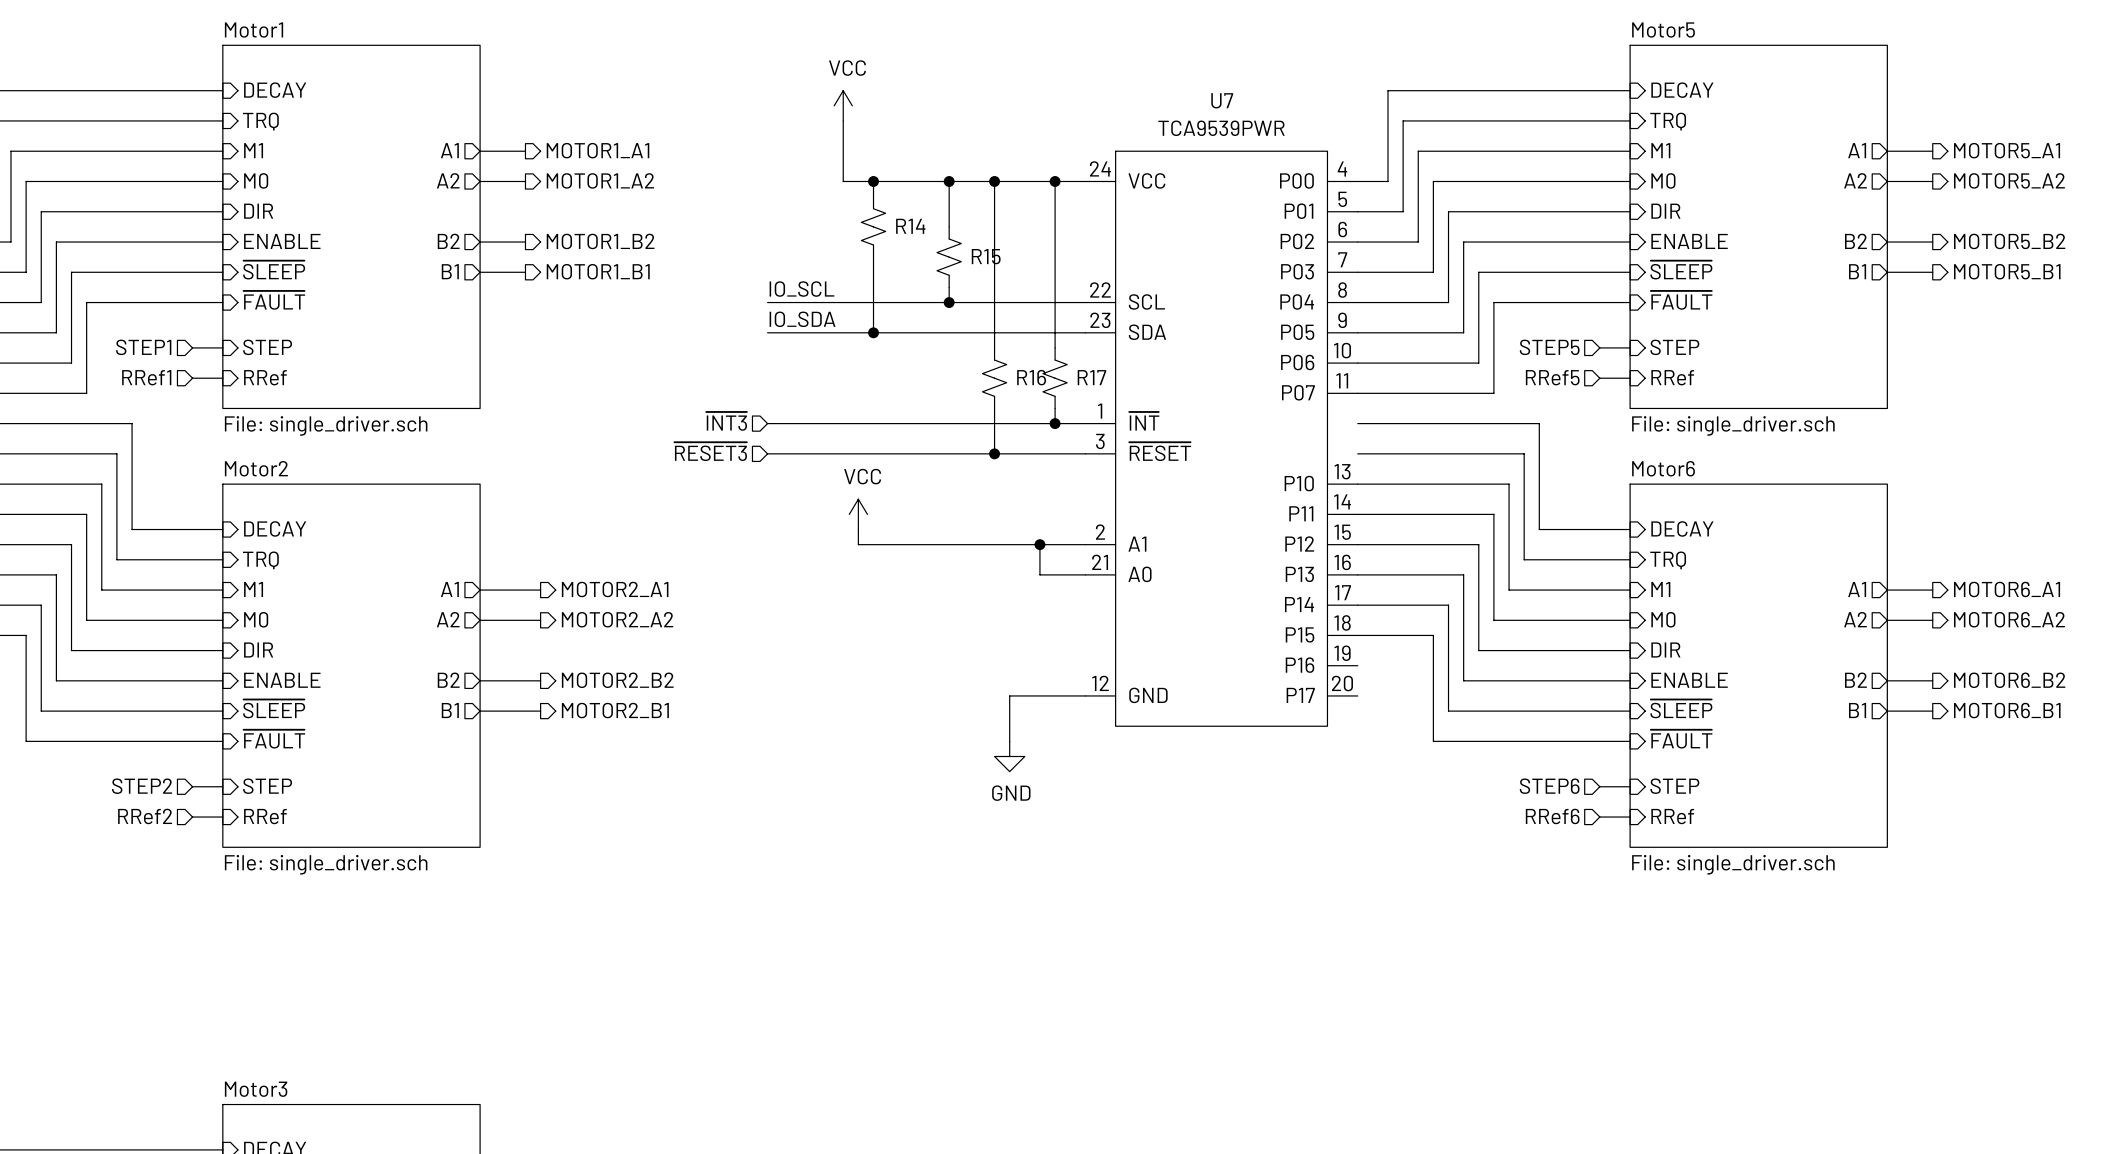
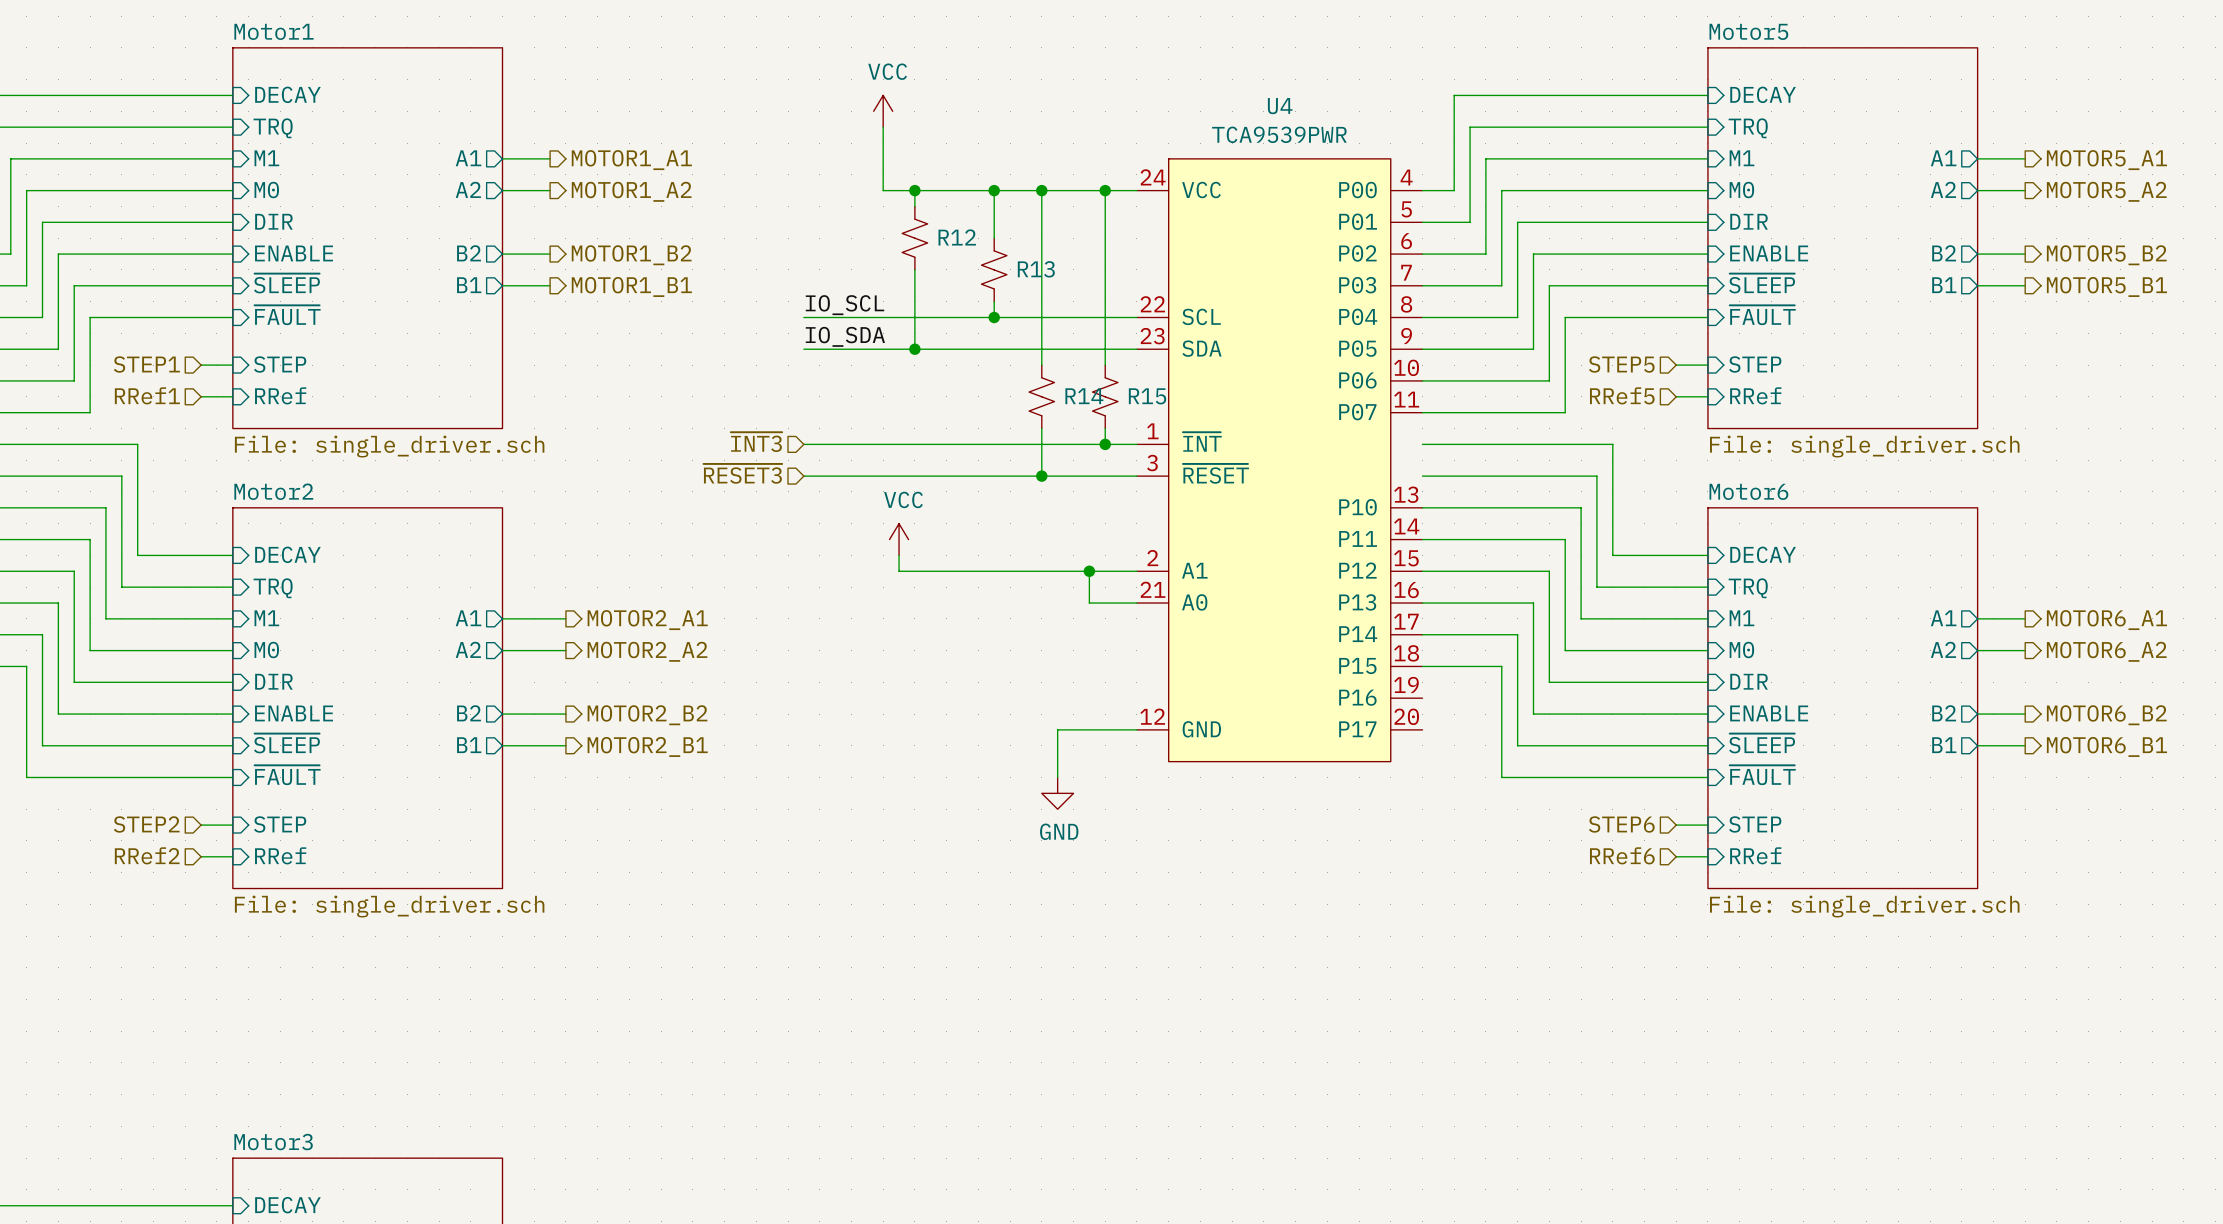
U7 name: U7 (1222, 100) -> U4 (1280, 106)
R14 name: R14 (910, 226) -> R12 (957, 237)
R15 name: R15 (986, 256) -> R13 (1036, 269)
R16 name: R16 (1031, 377) -> R14 (1084, 396)
R17 name: R17 (1091, 377) -> R15 (1147, 396)

